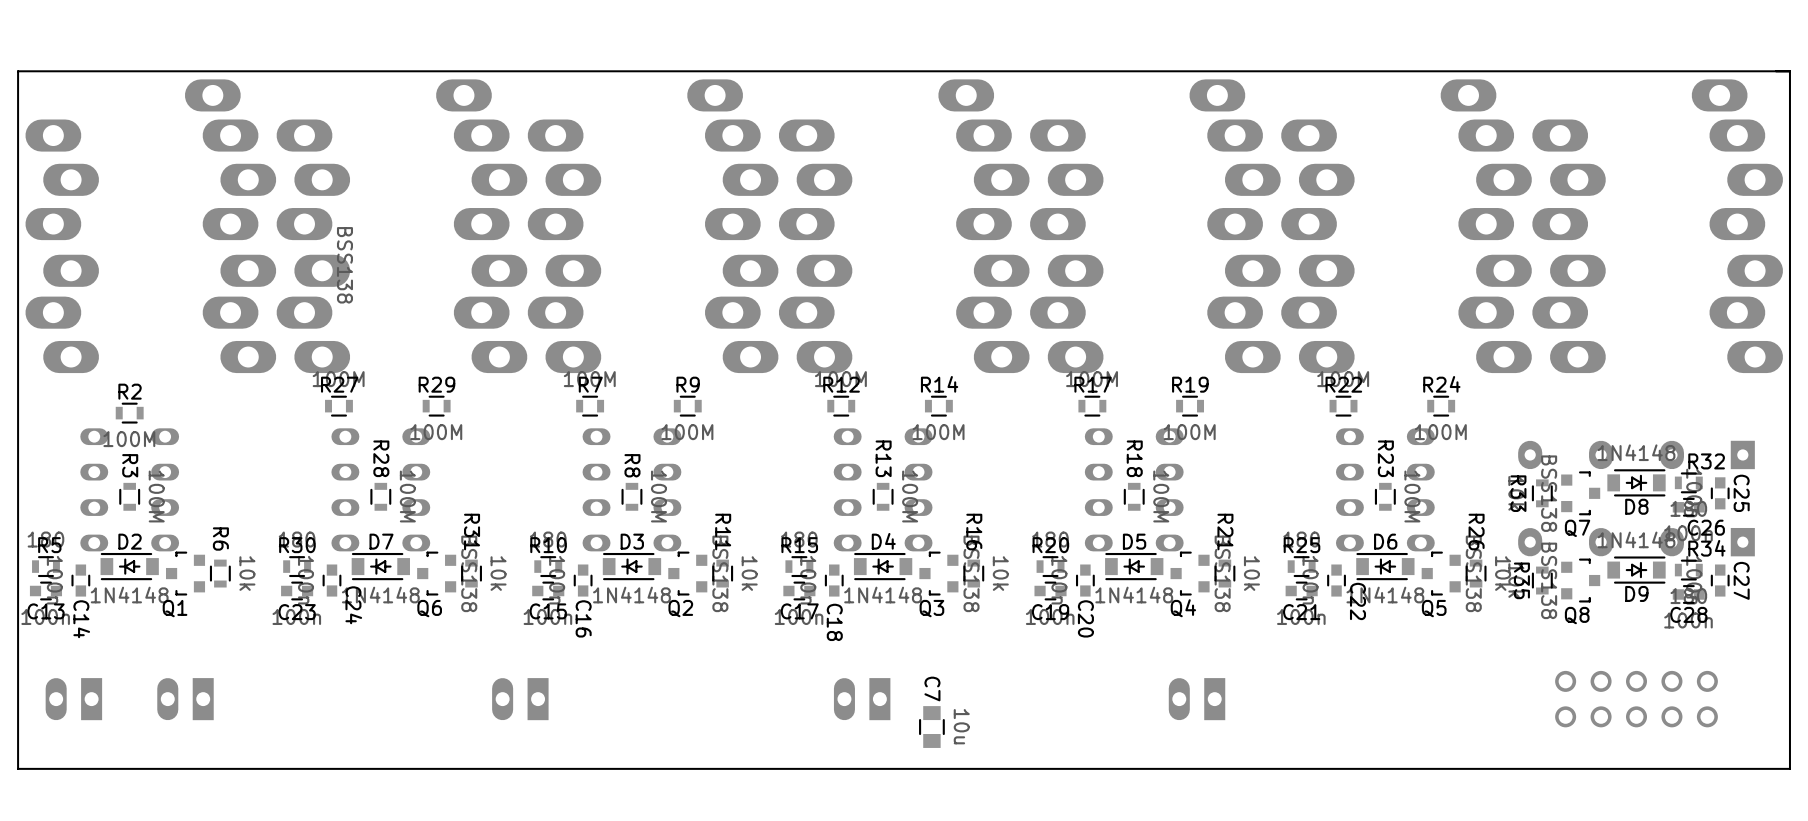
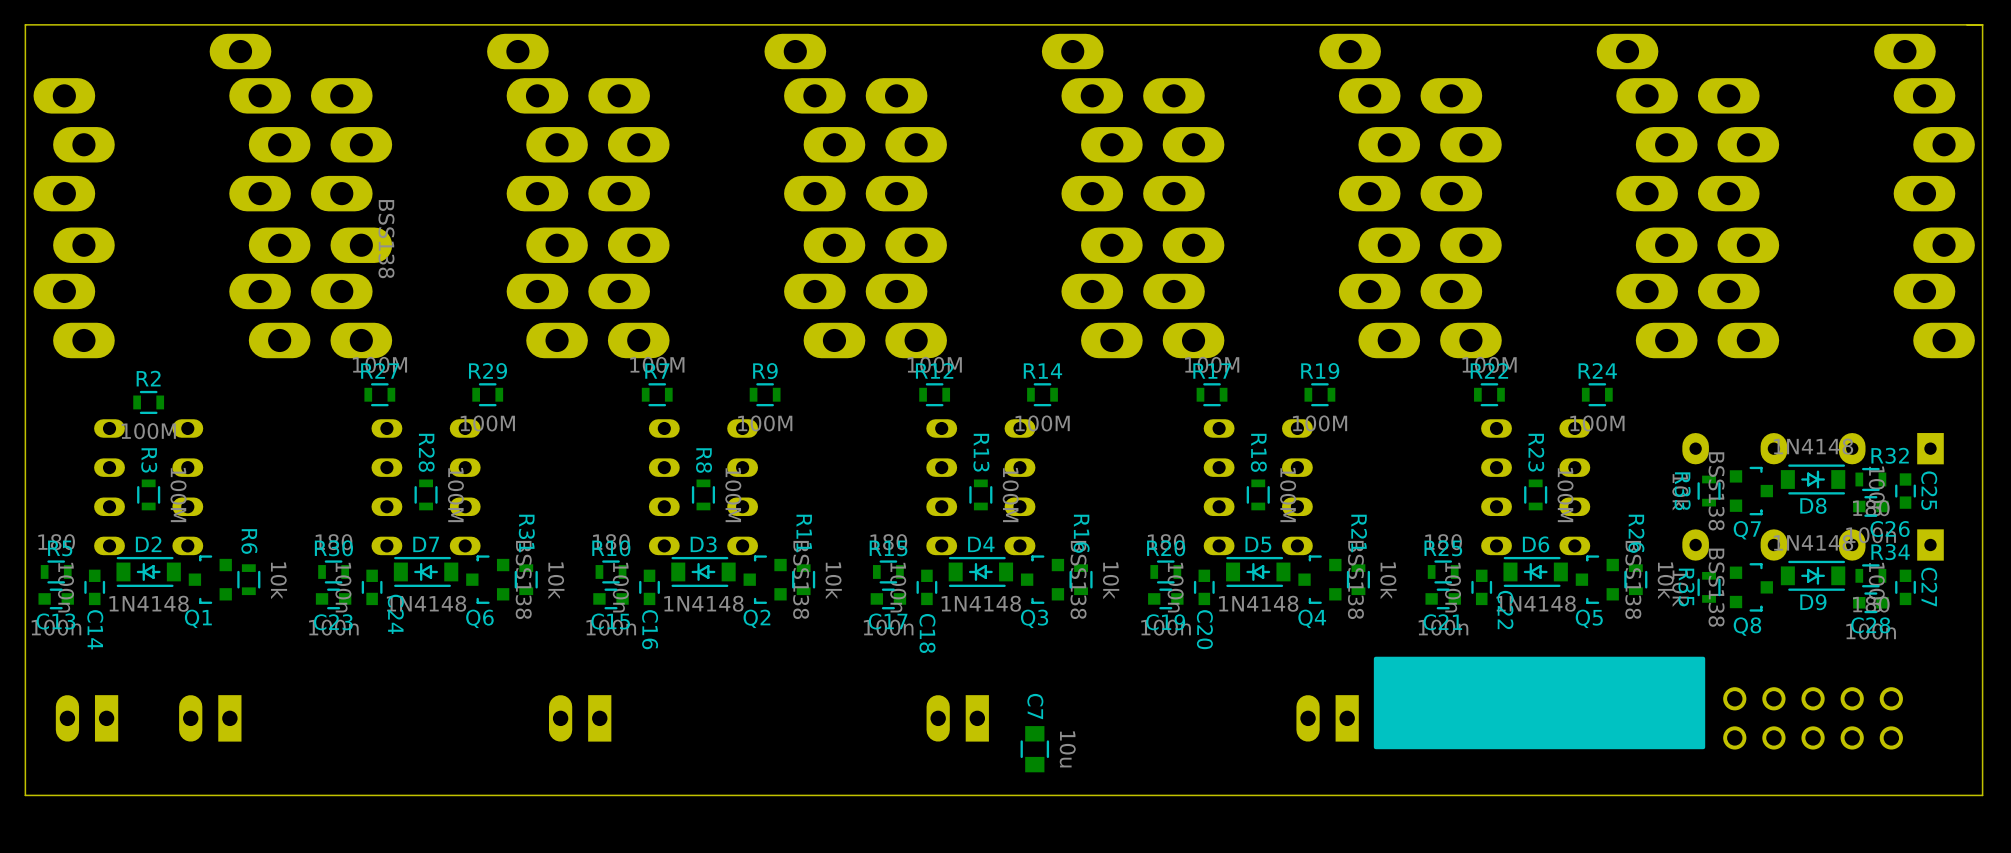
drawing: none -> [1373, 656, 1706, 750]

